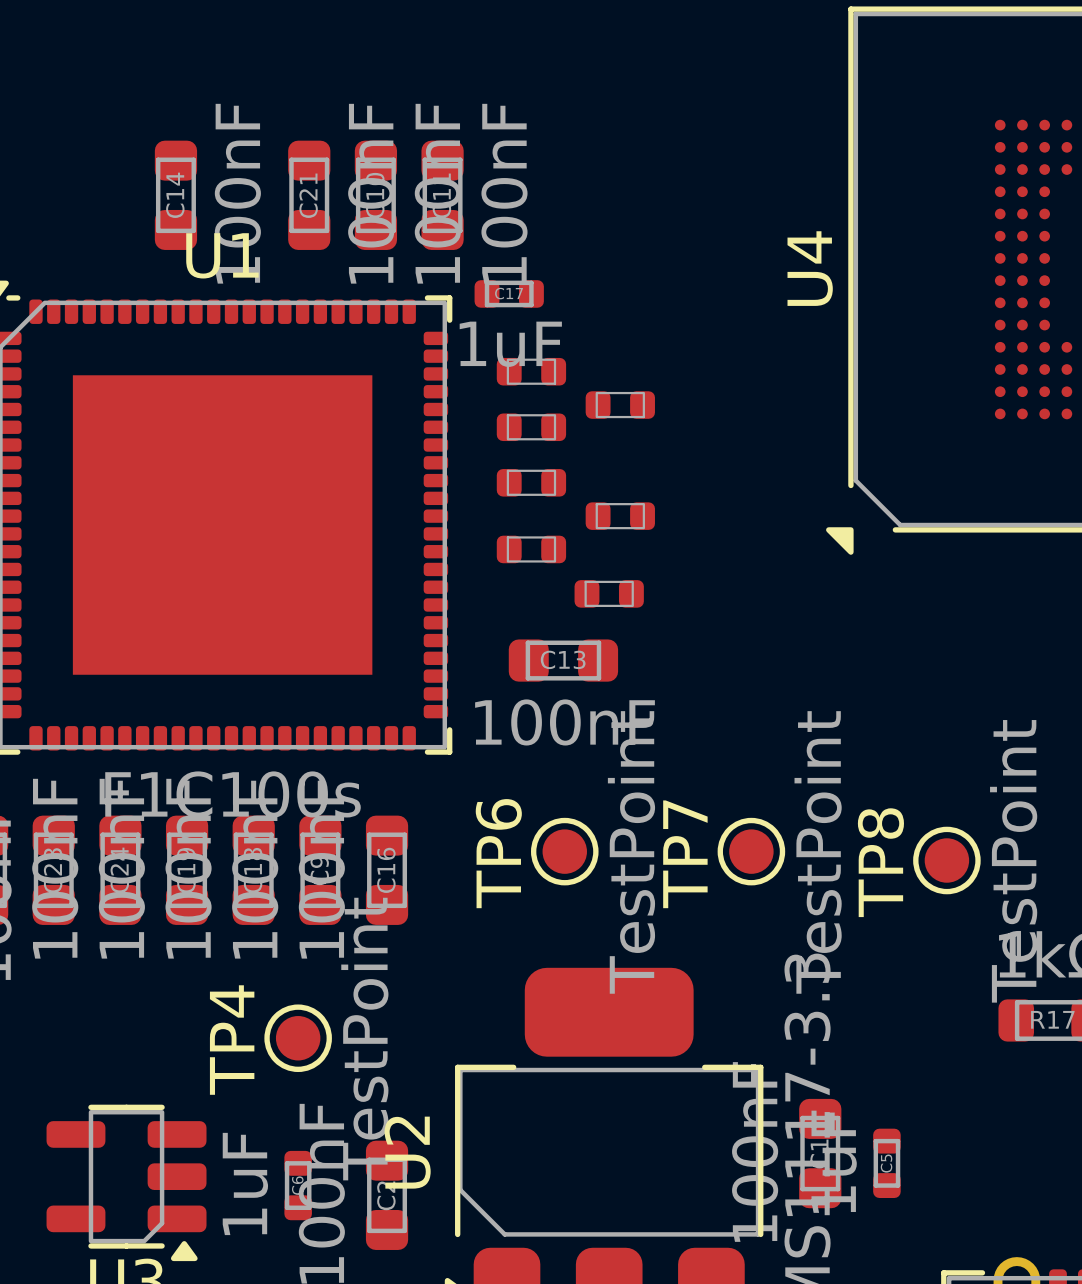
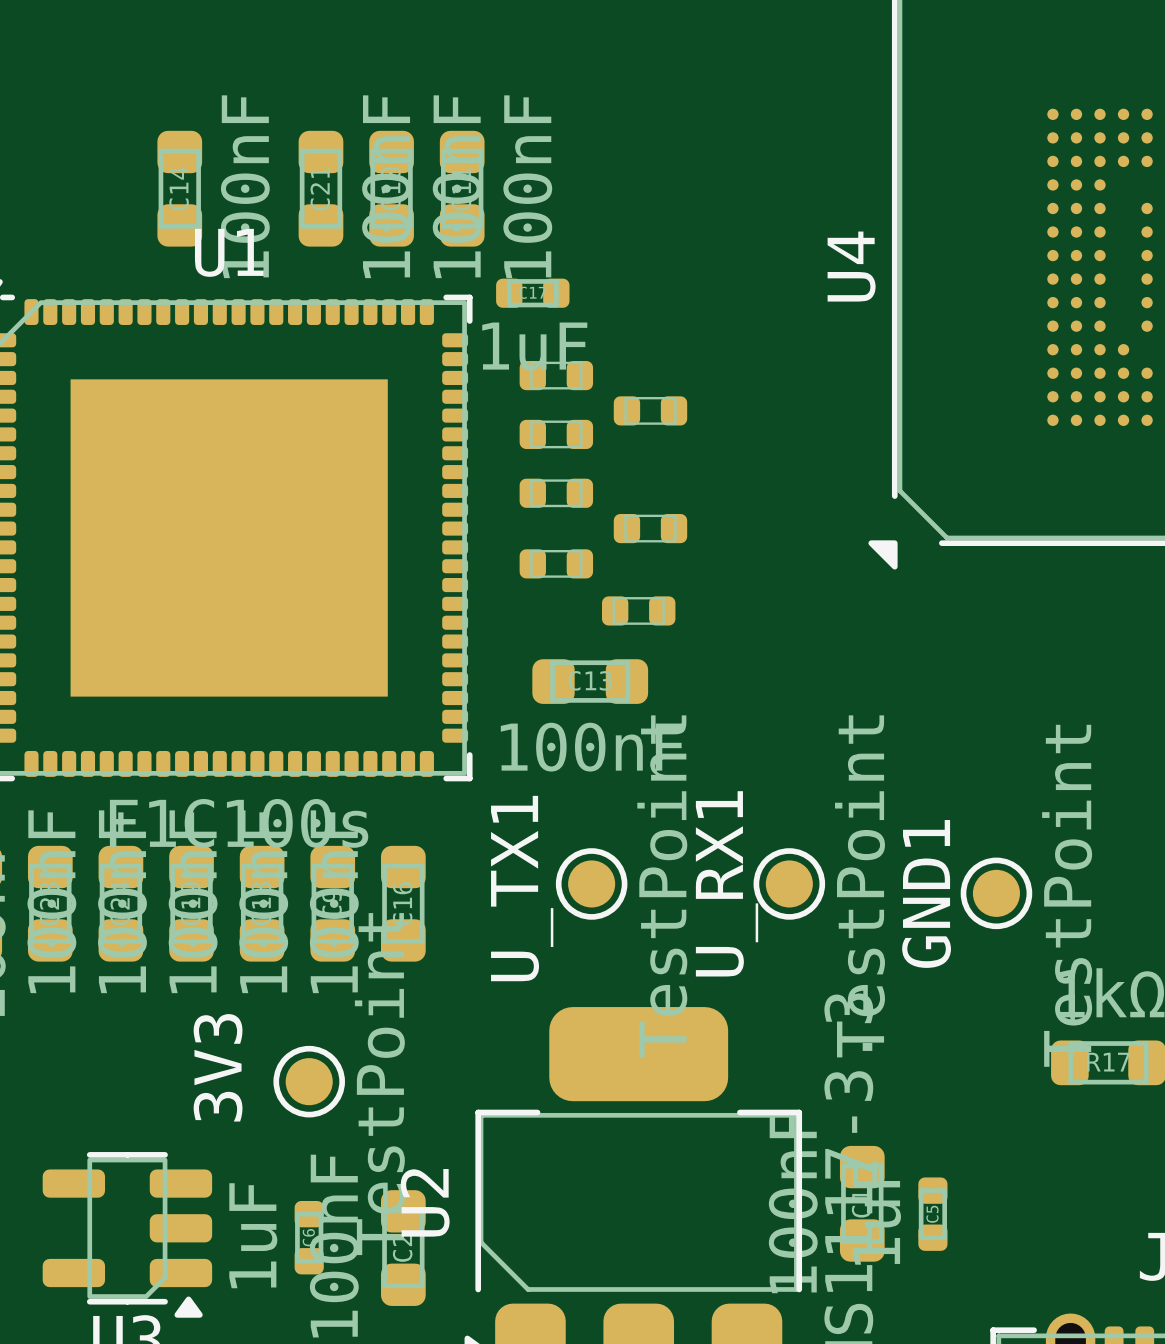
TP6 name: TP6 (498, 853) -> U_TX1 (522, 888)
TP7 name: TP7 (685, 854) -> U_RX1 (727, 883)
TP8 name: TP8 (880, 862) -> GND1 (926, 893)
TP4 name: TP4 (232, 1040) -> 3V3 (218, 1067)

